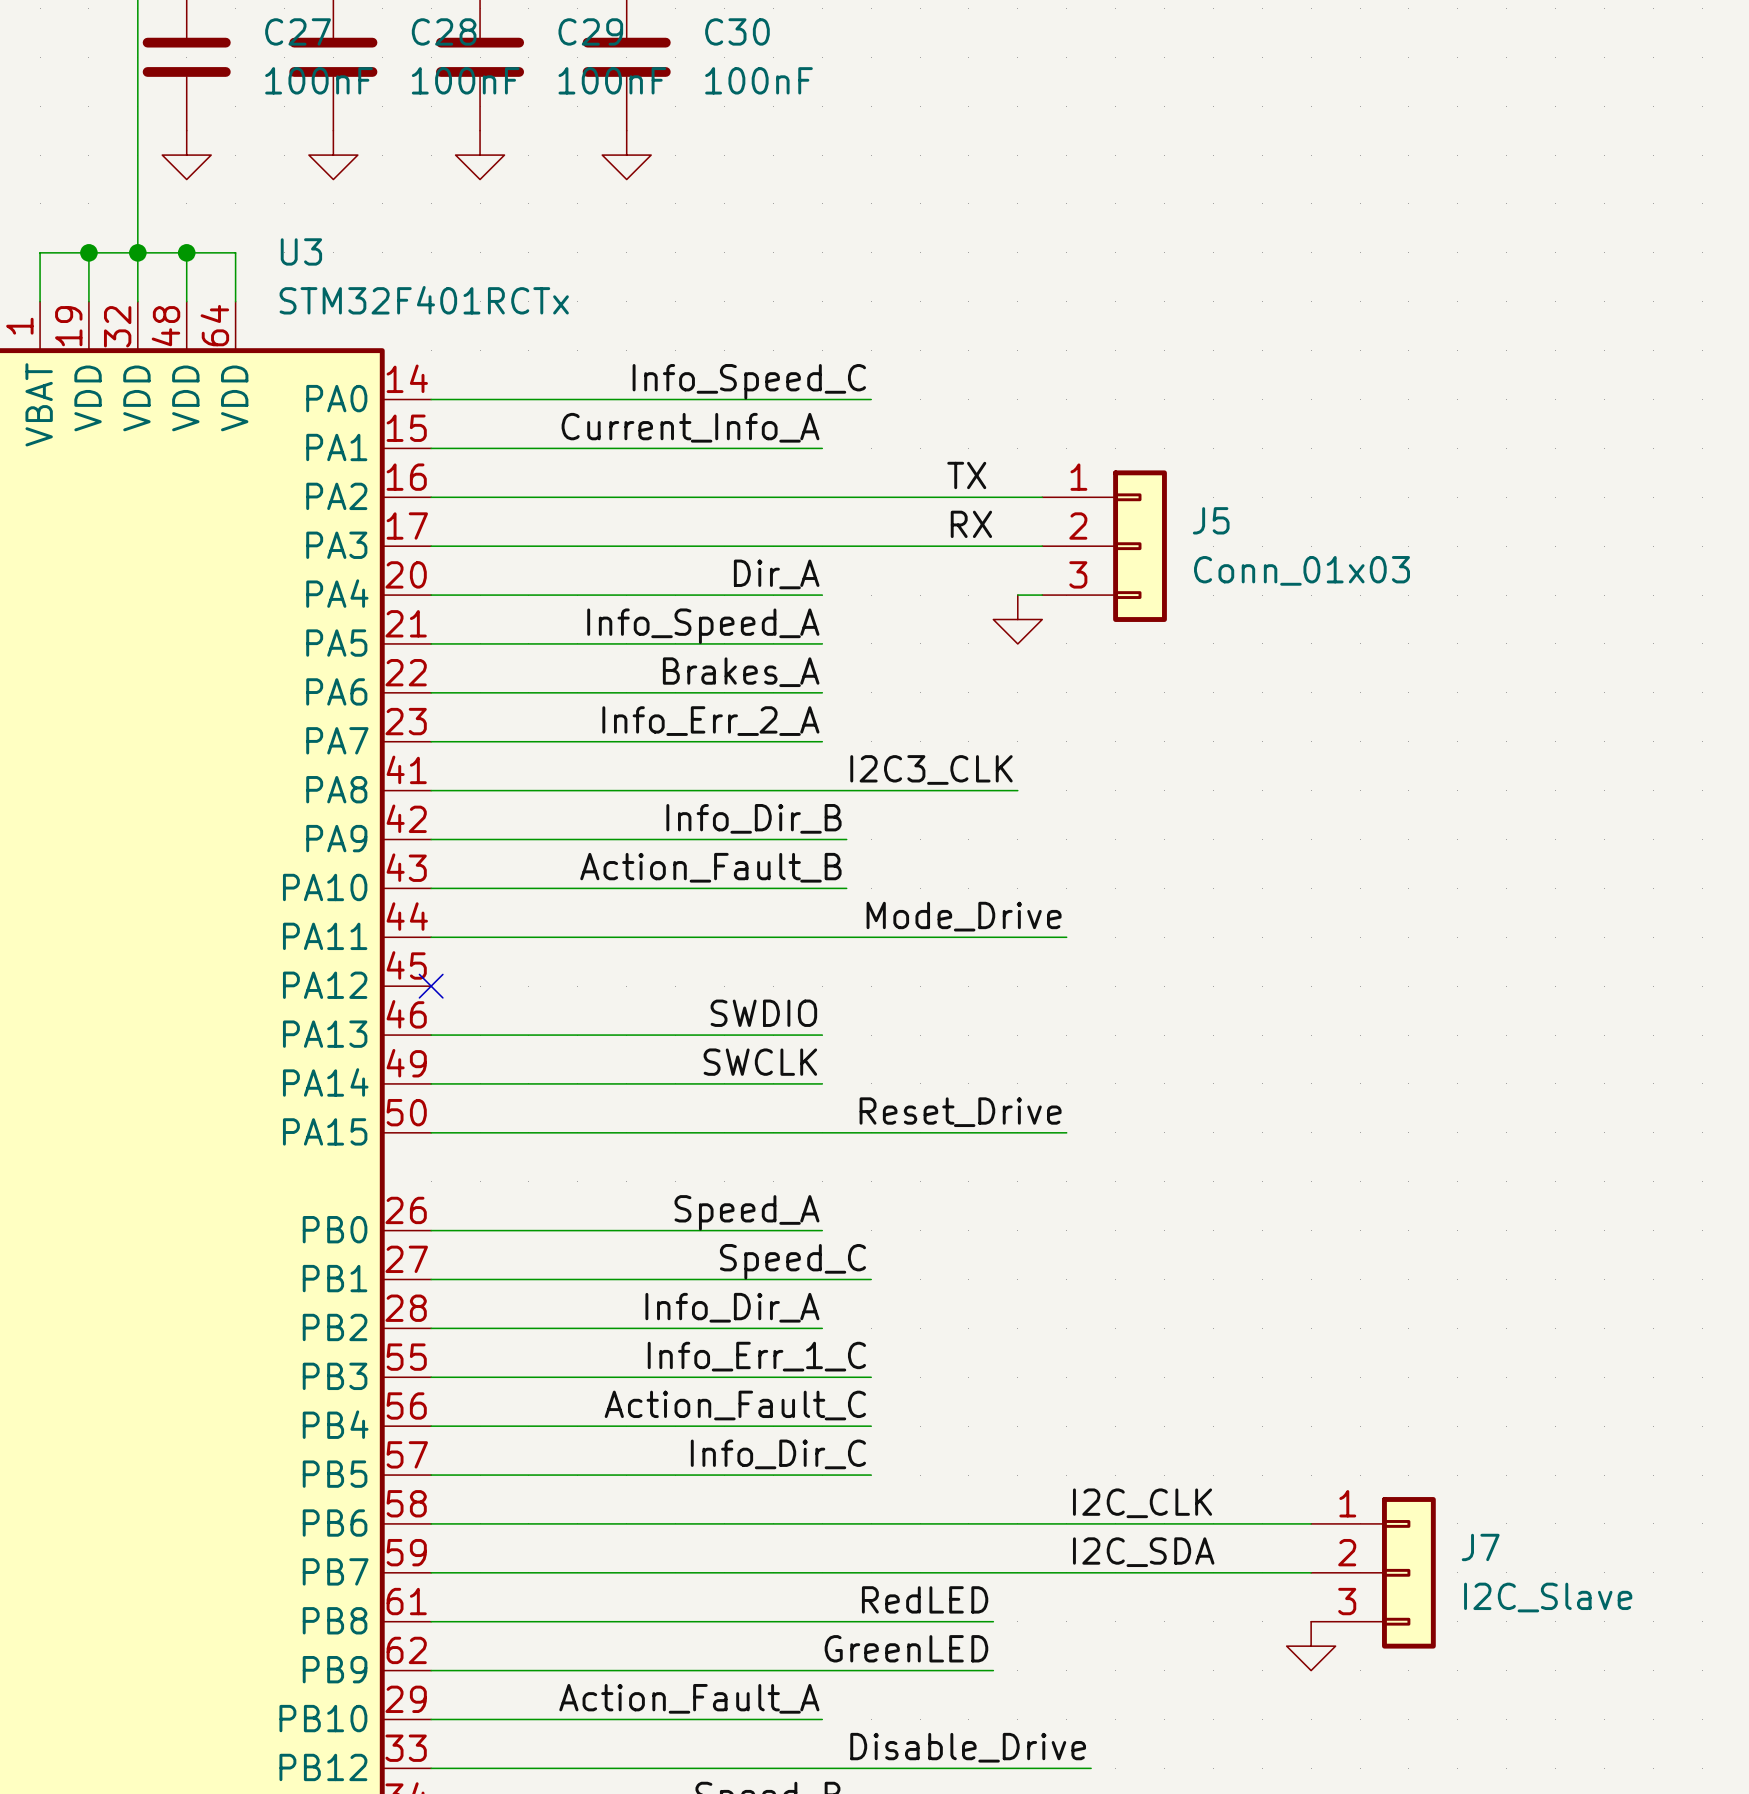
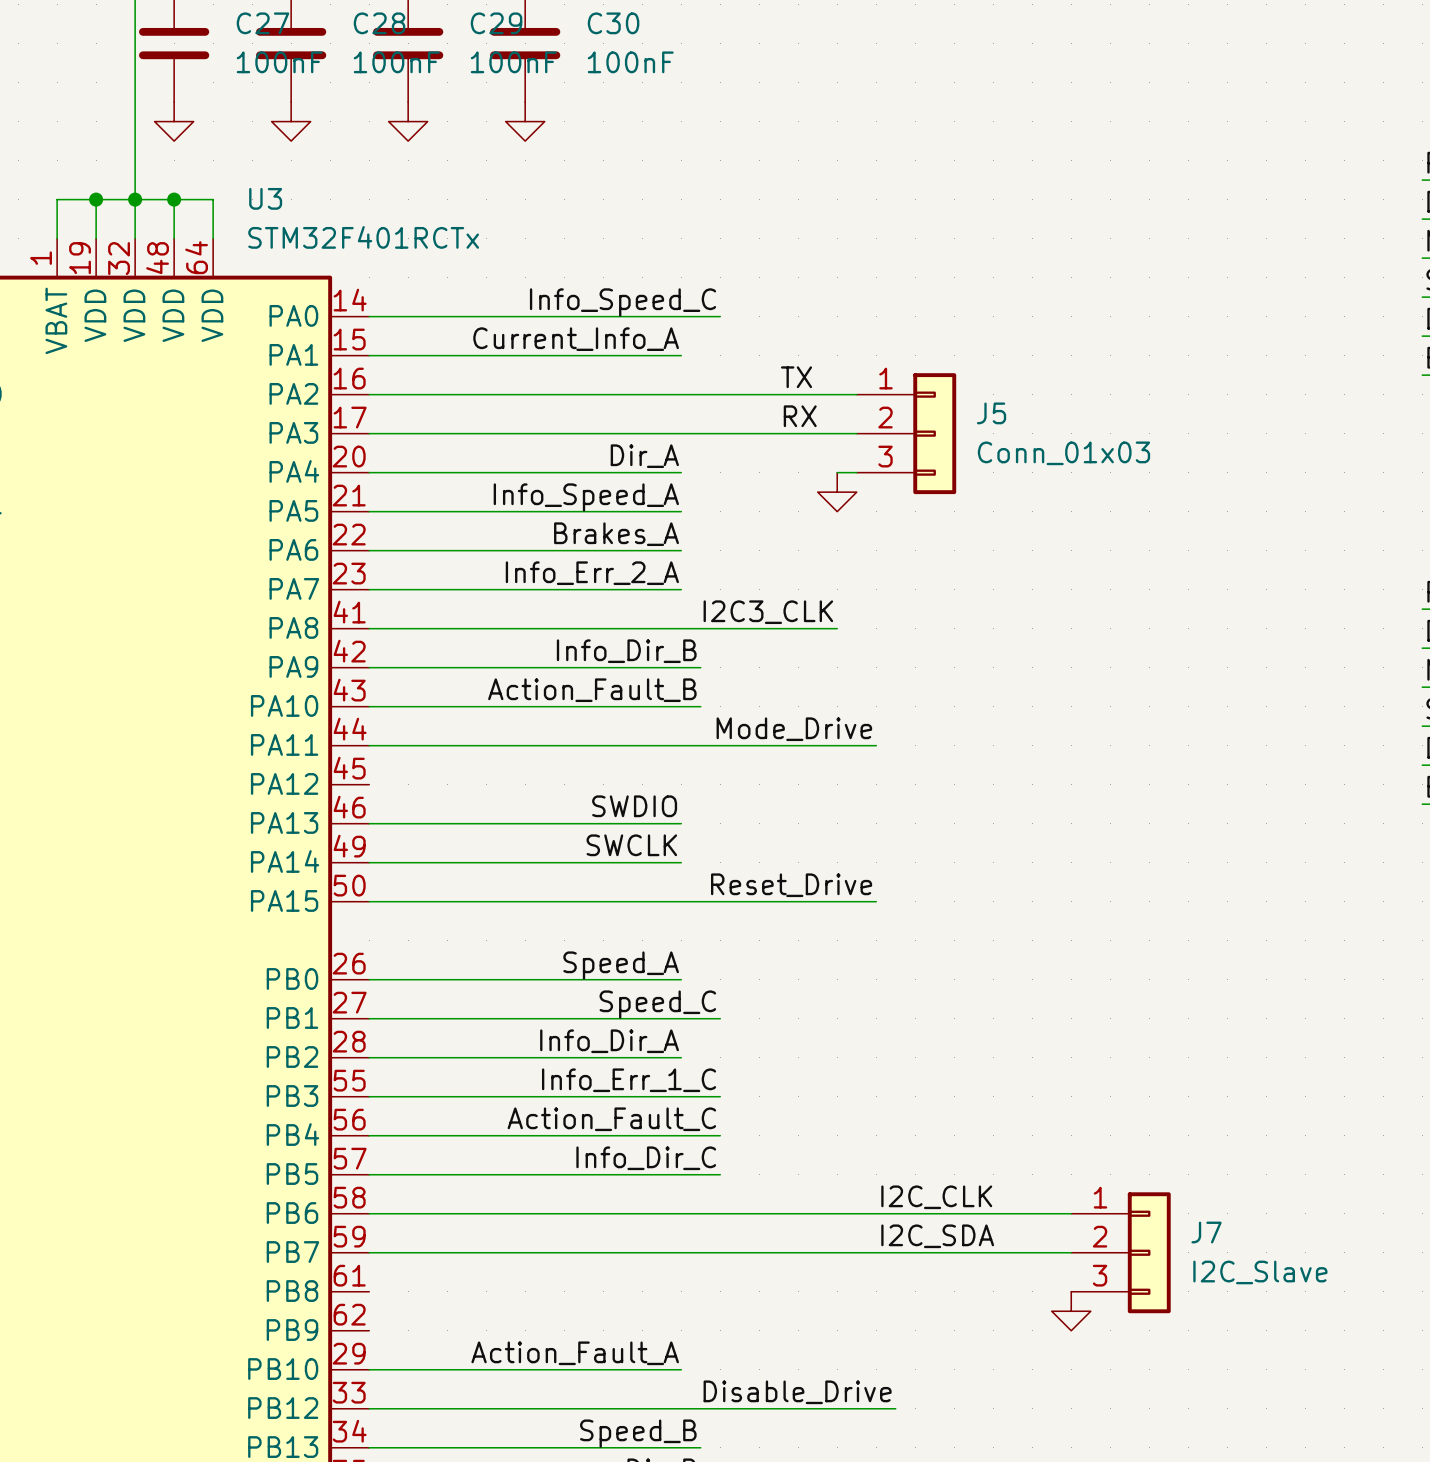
no-connect mark: (431, 986) -> none
label: RedLED (925, 1599) -> none
wire: (431, 1621) (993, 1621) -> none
label: GreenLED (906, 1648) -> none
wire: (431, 1670) (993, 1670) -> none

